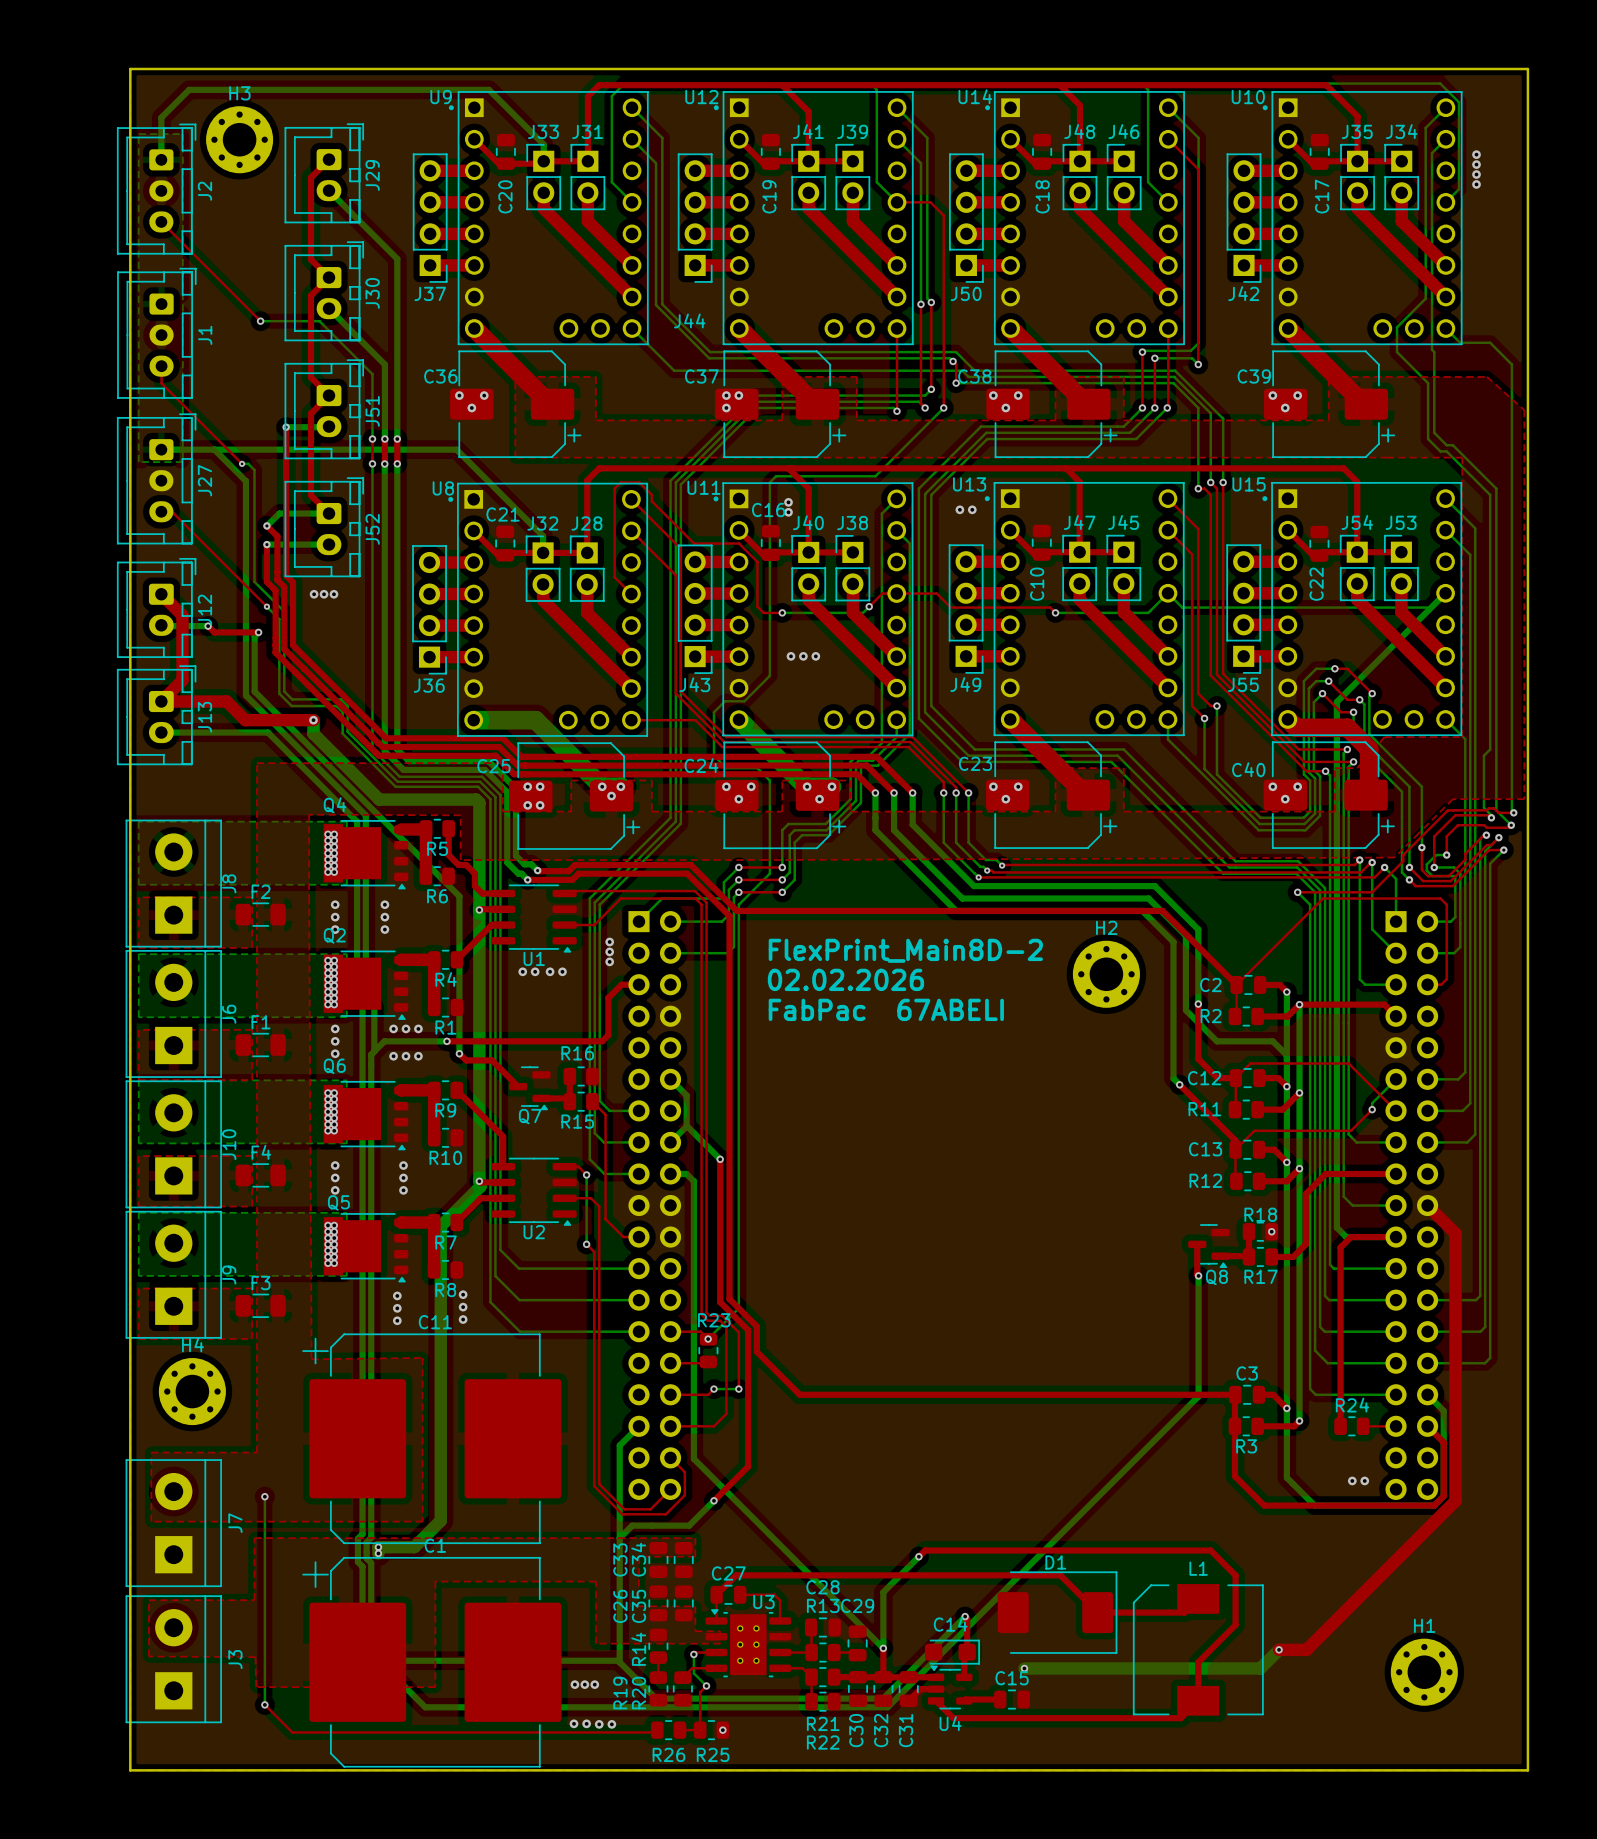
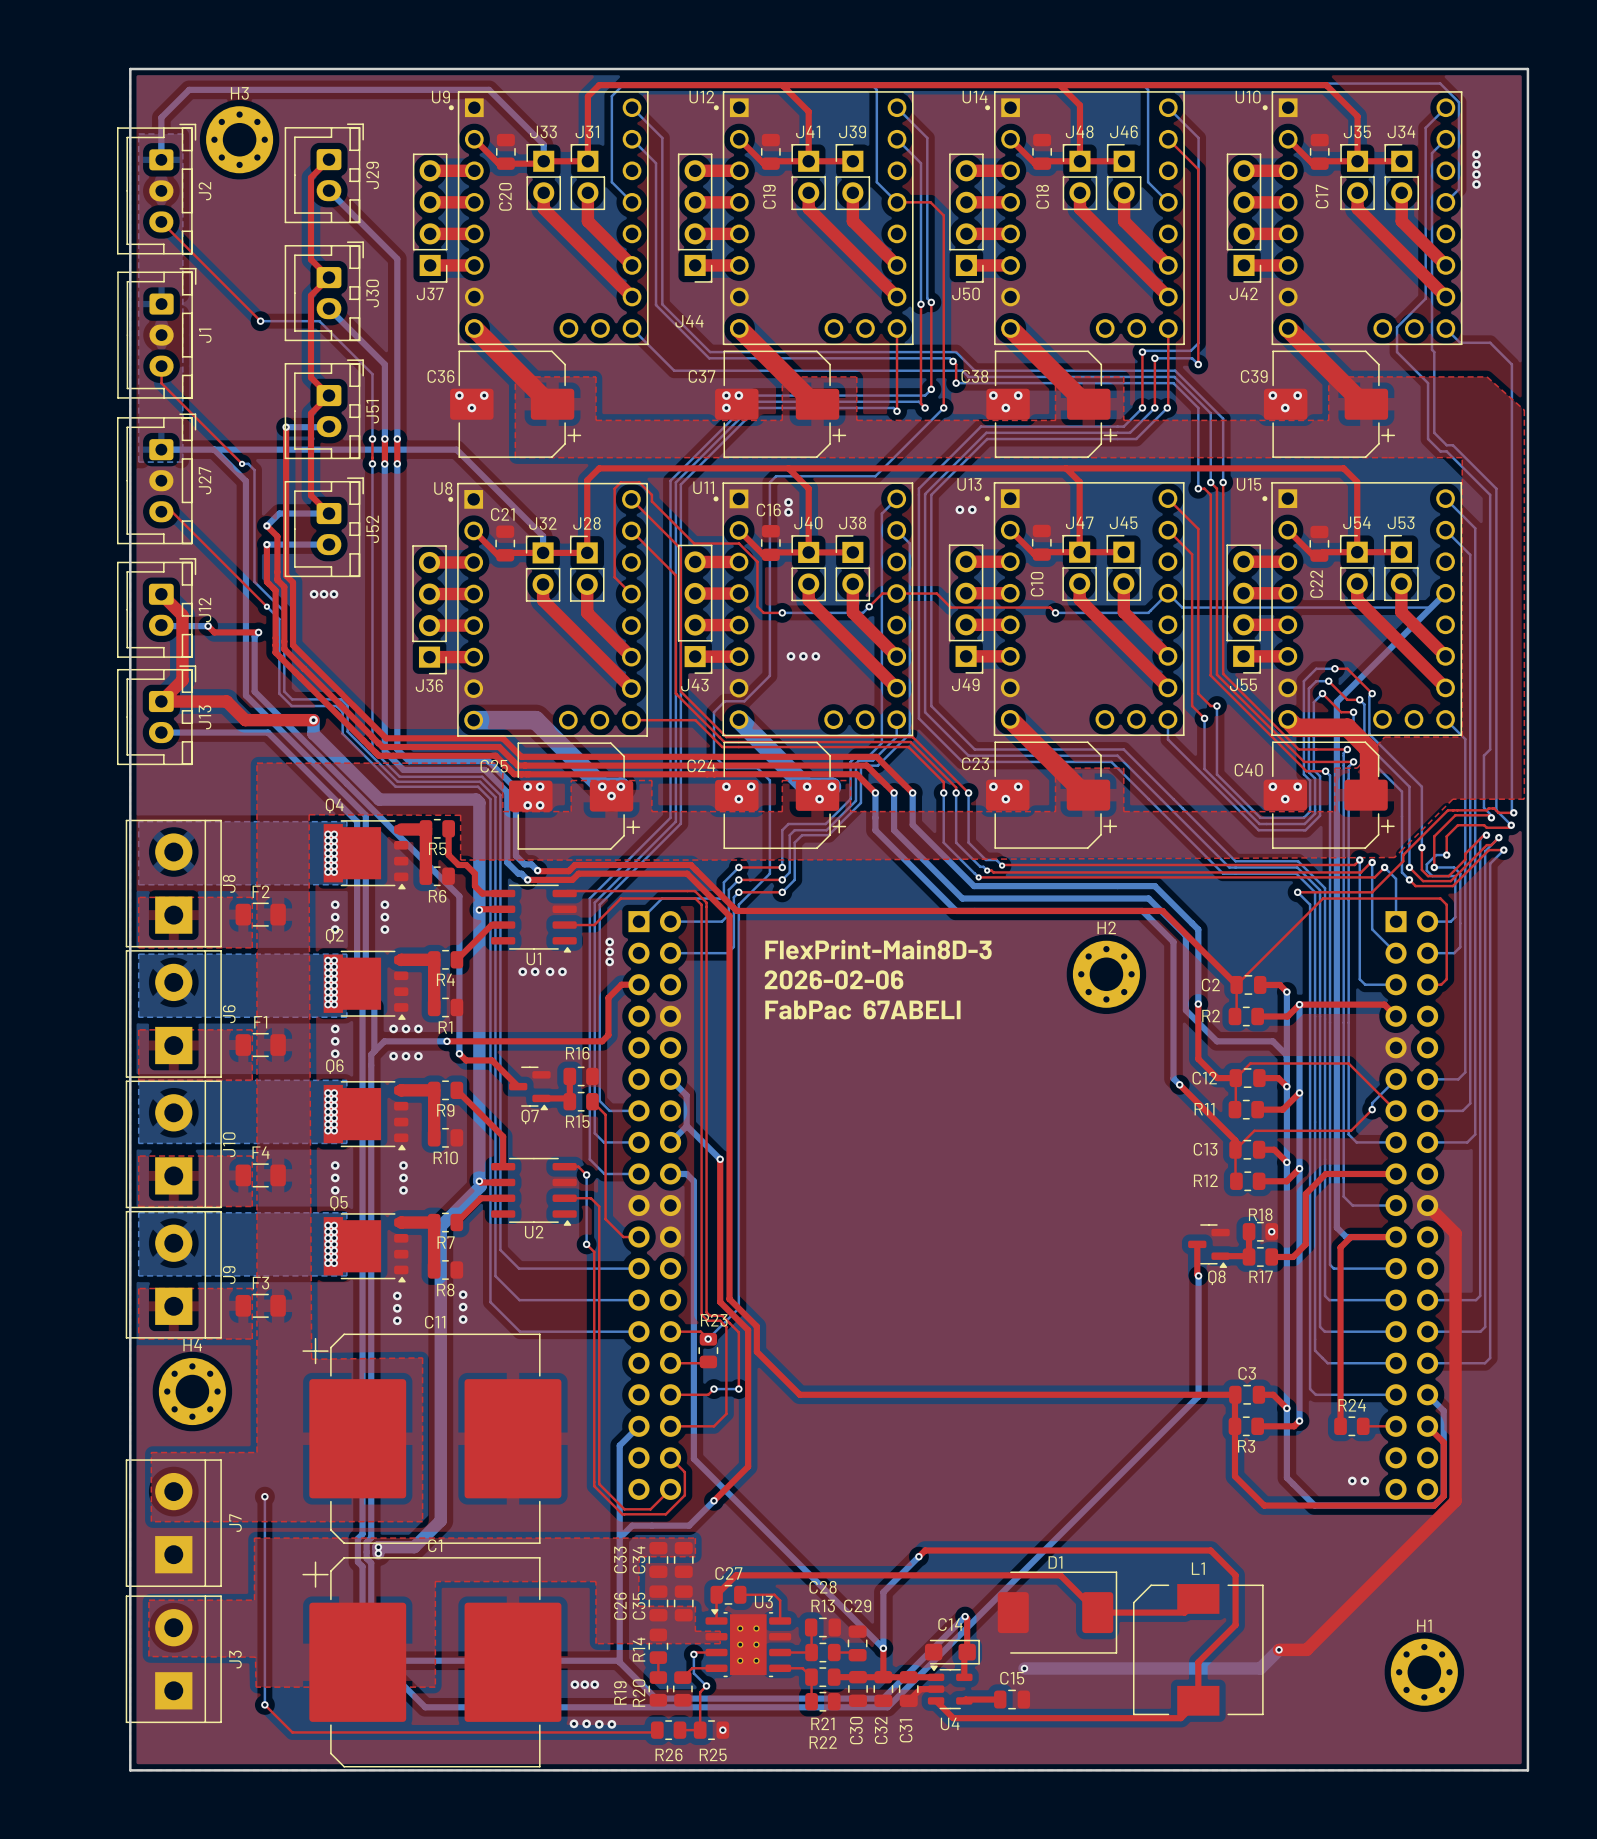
text: FlexPrint_Main8D-2 (905, 950) -> FlexPrint-Main8D-3 (878, 949)
text: 02.02.2026 (845, 979) -> 2026-02-06 (834, 979)

